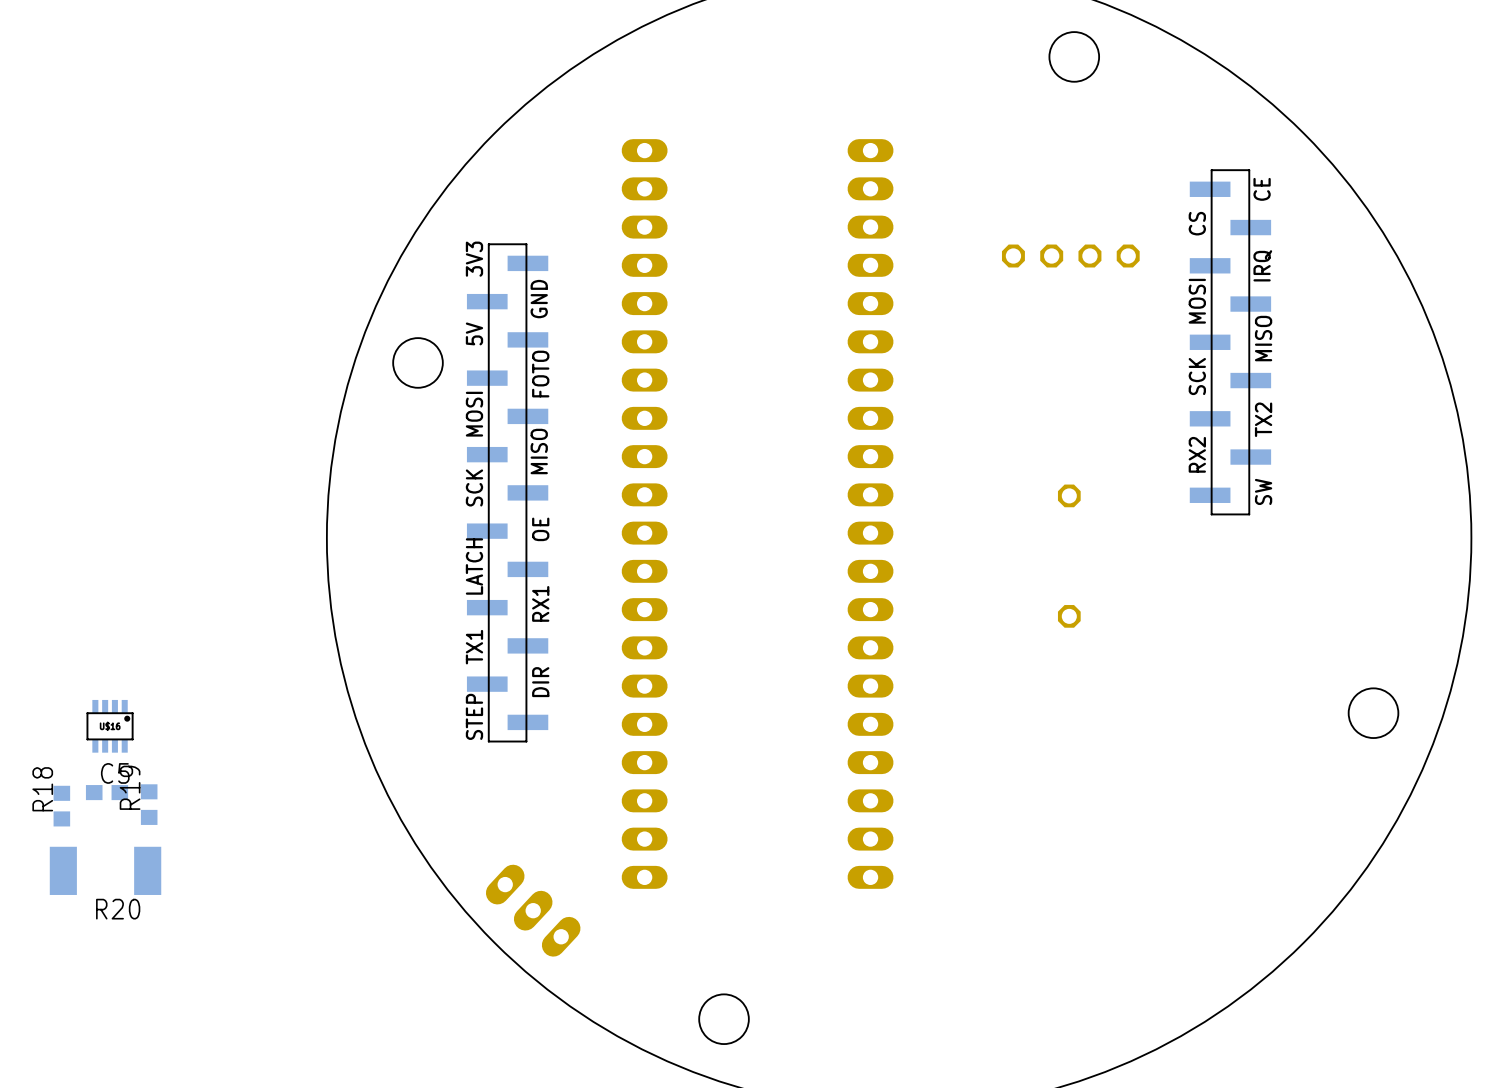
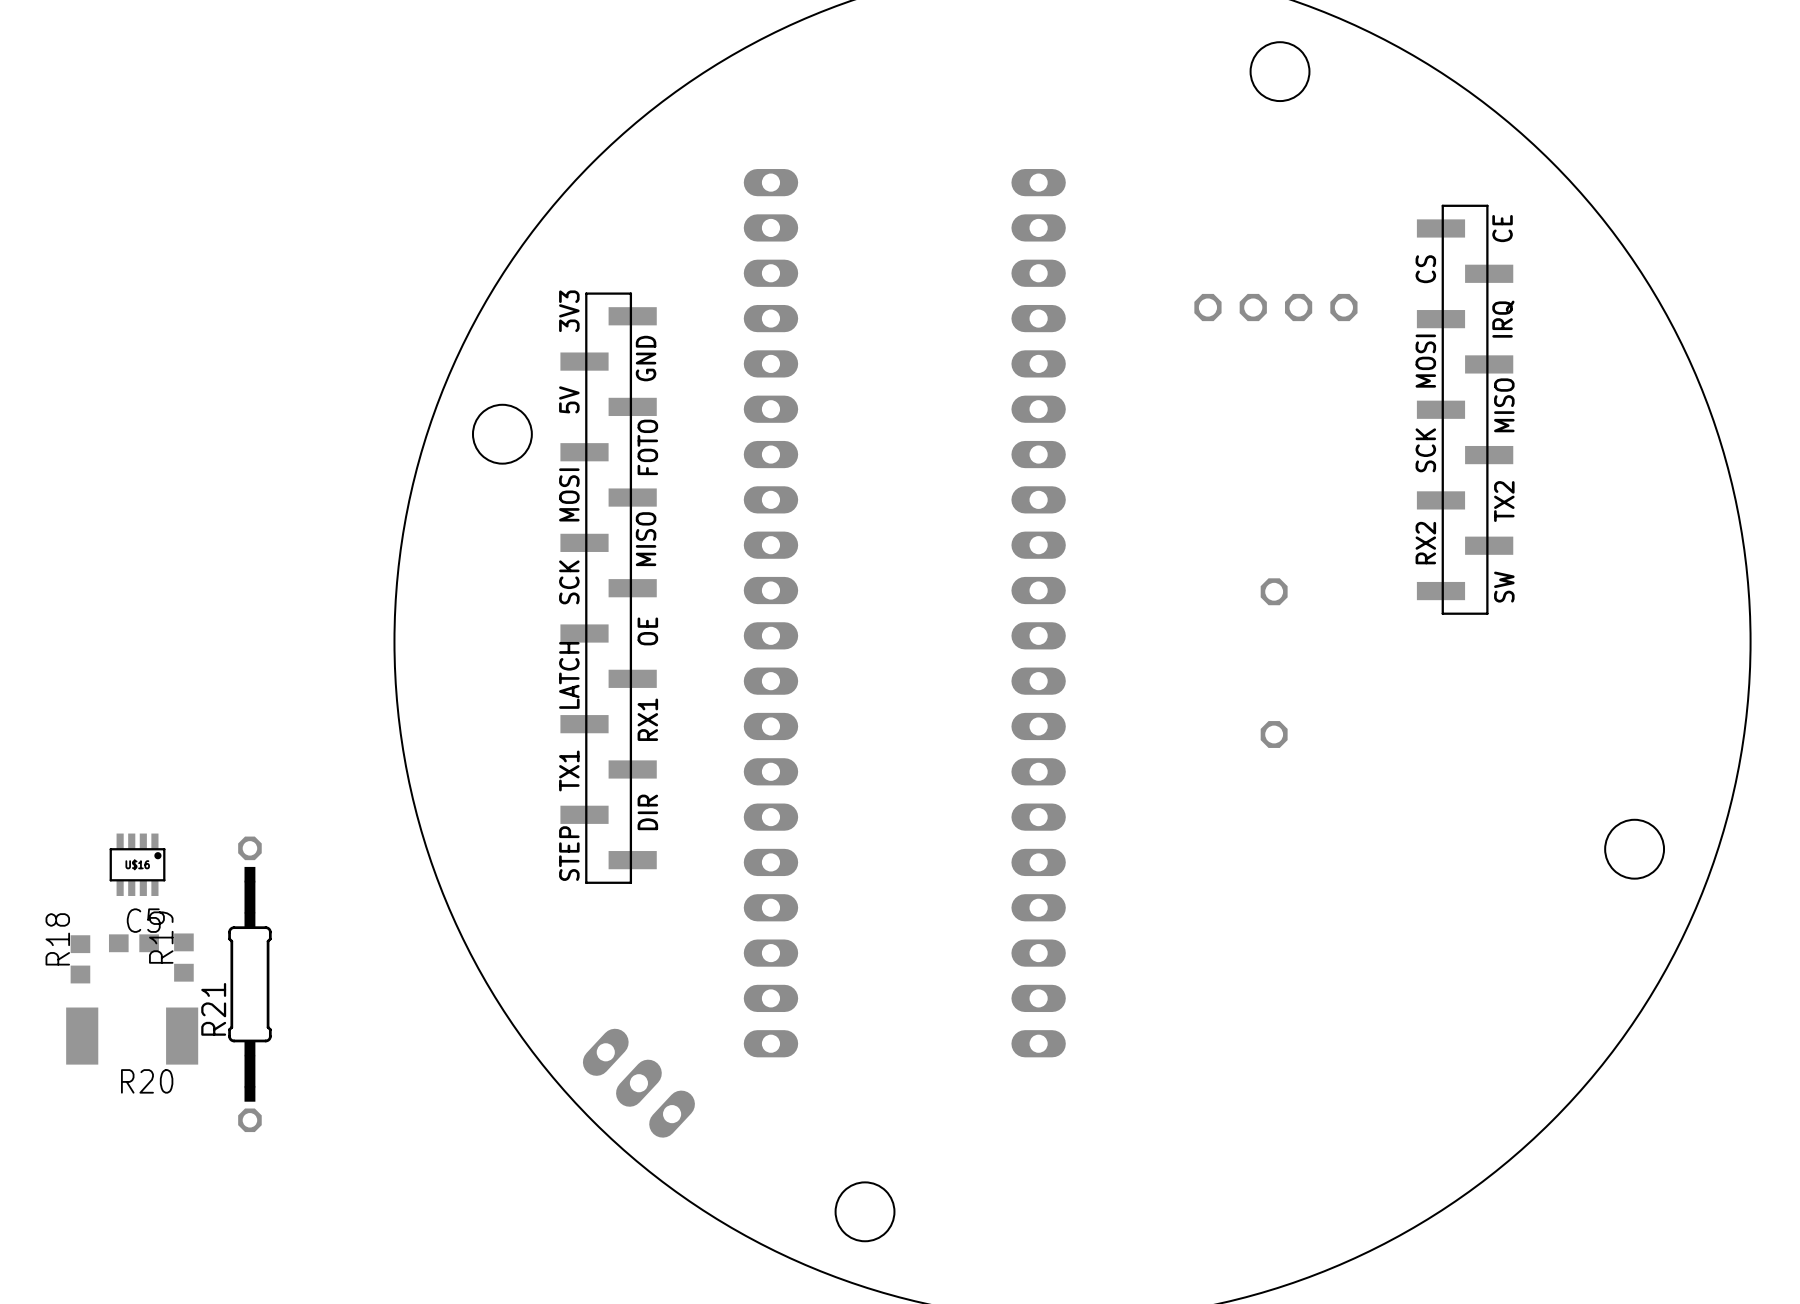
R21: none -> (249, 984)

